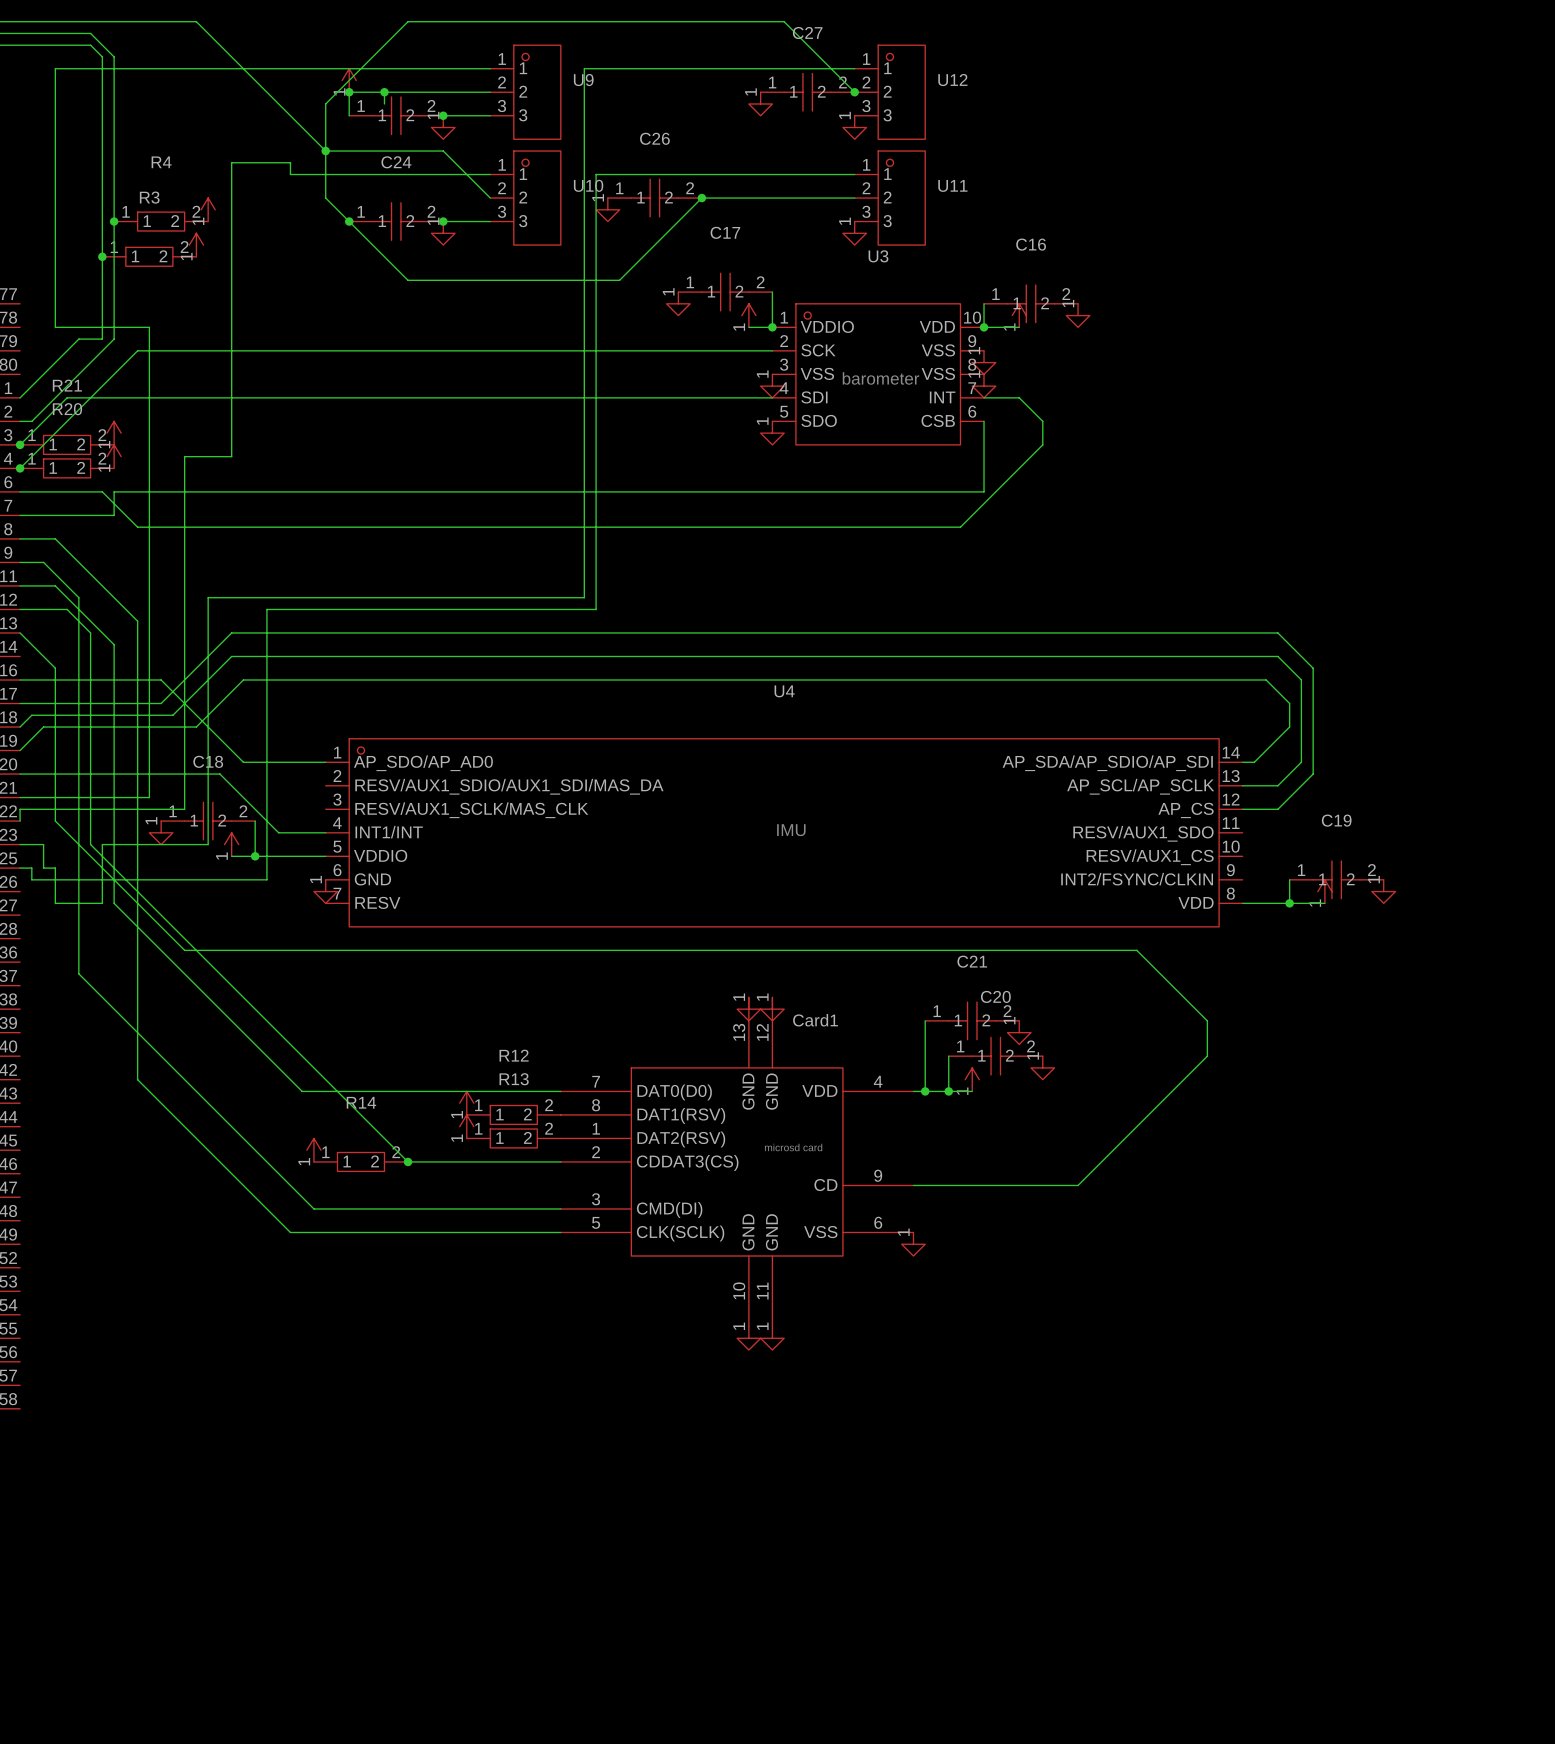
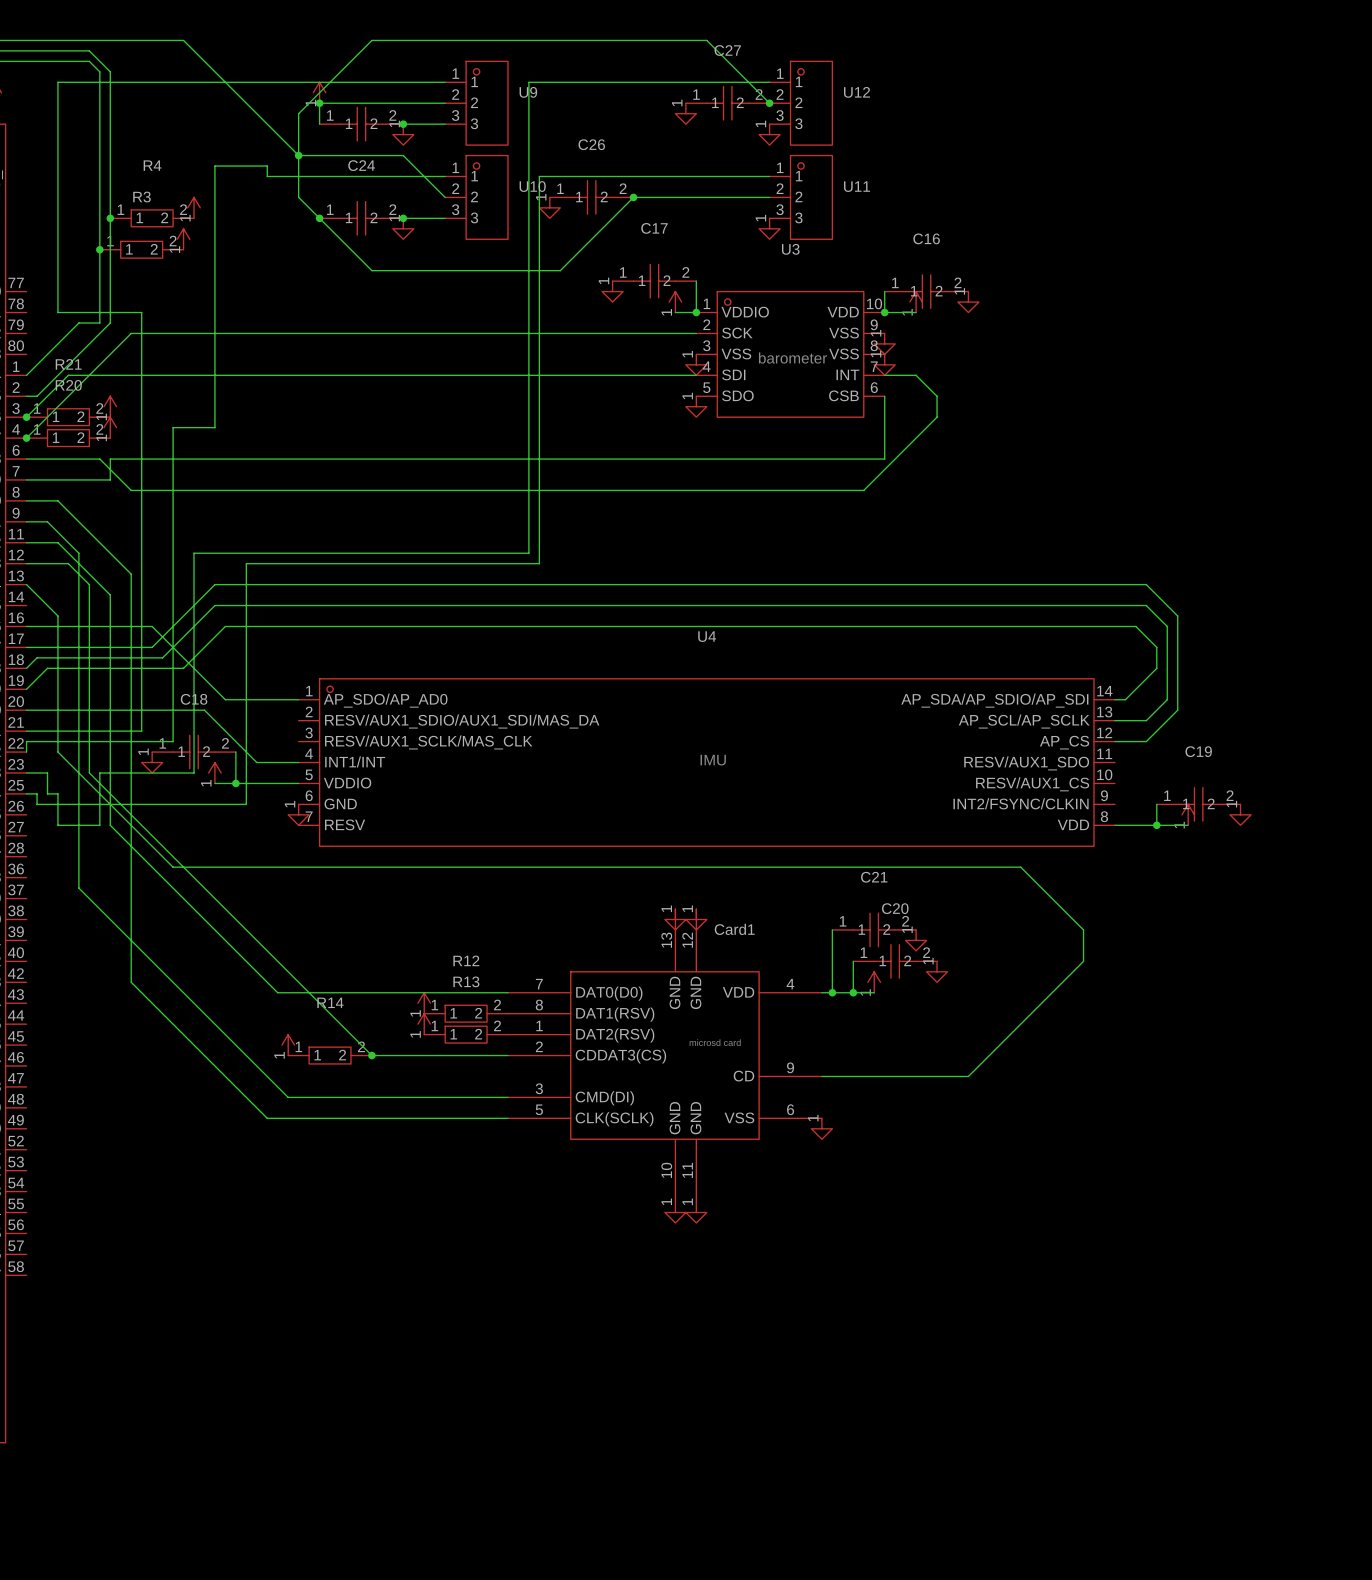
wire: (384, 92) (384, 103) -> none
junction: (384, 92) -> none

